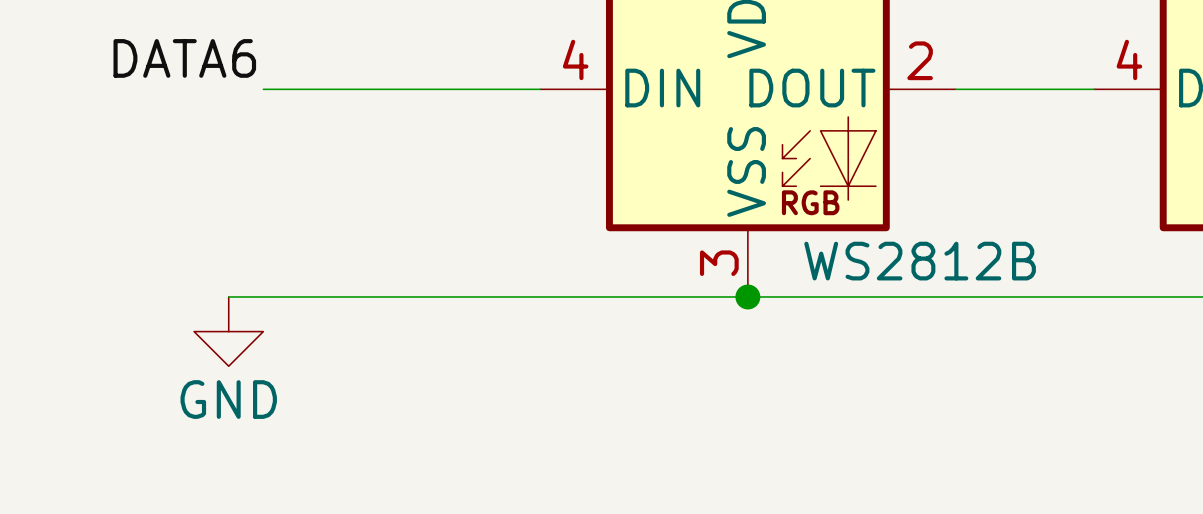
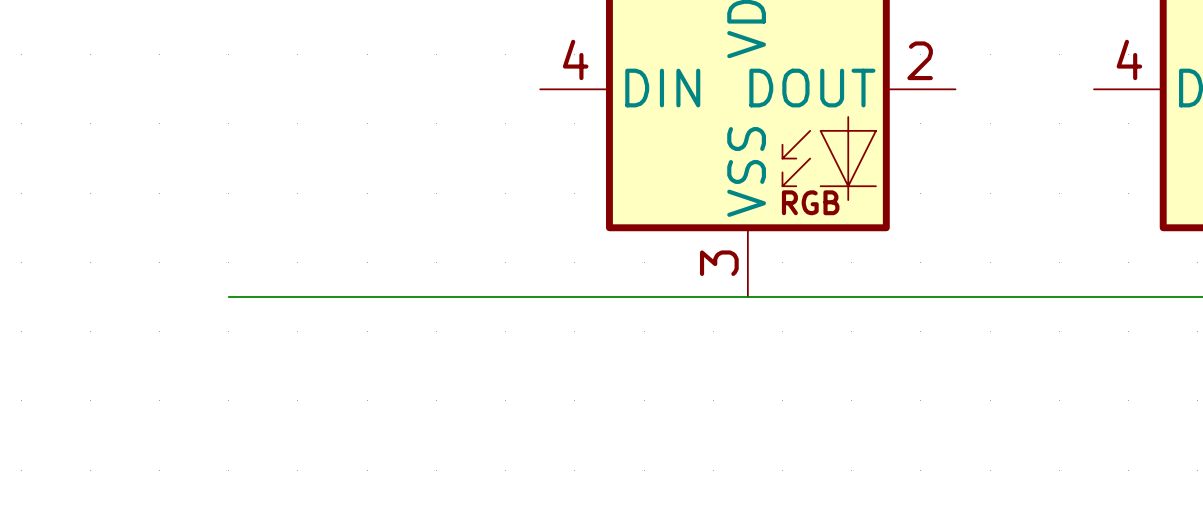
label: DATA6 (184, 58) -> none
wire: (263, 89) (540, 89) -> none
wire: (955, 89) (1093, 89) -> none
part text: WS2812B (920, 261) -> none
junction: (747, 296) -> none
power symbol: GND (228, 331) -> none

